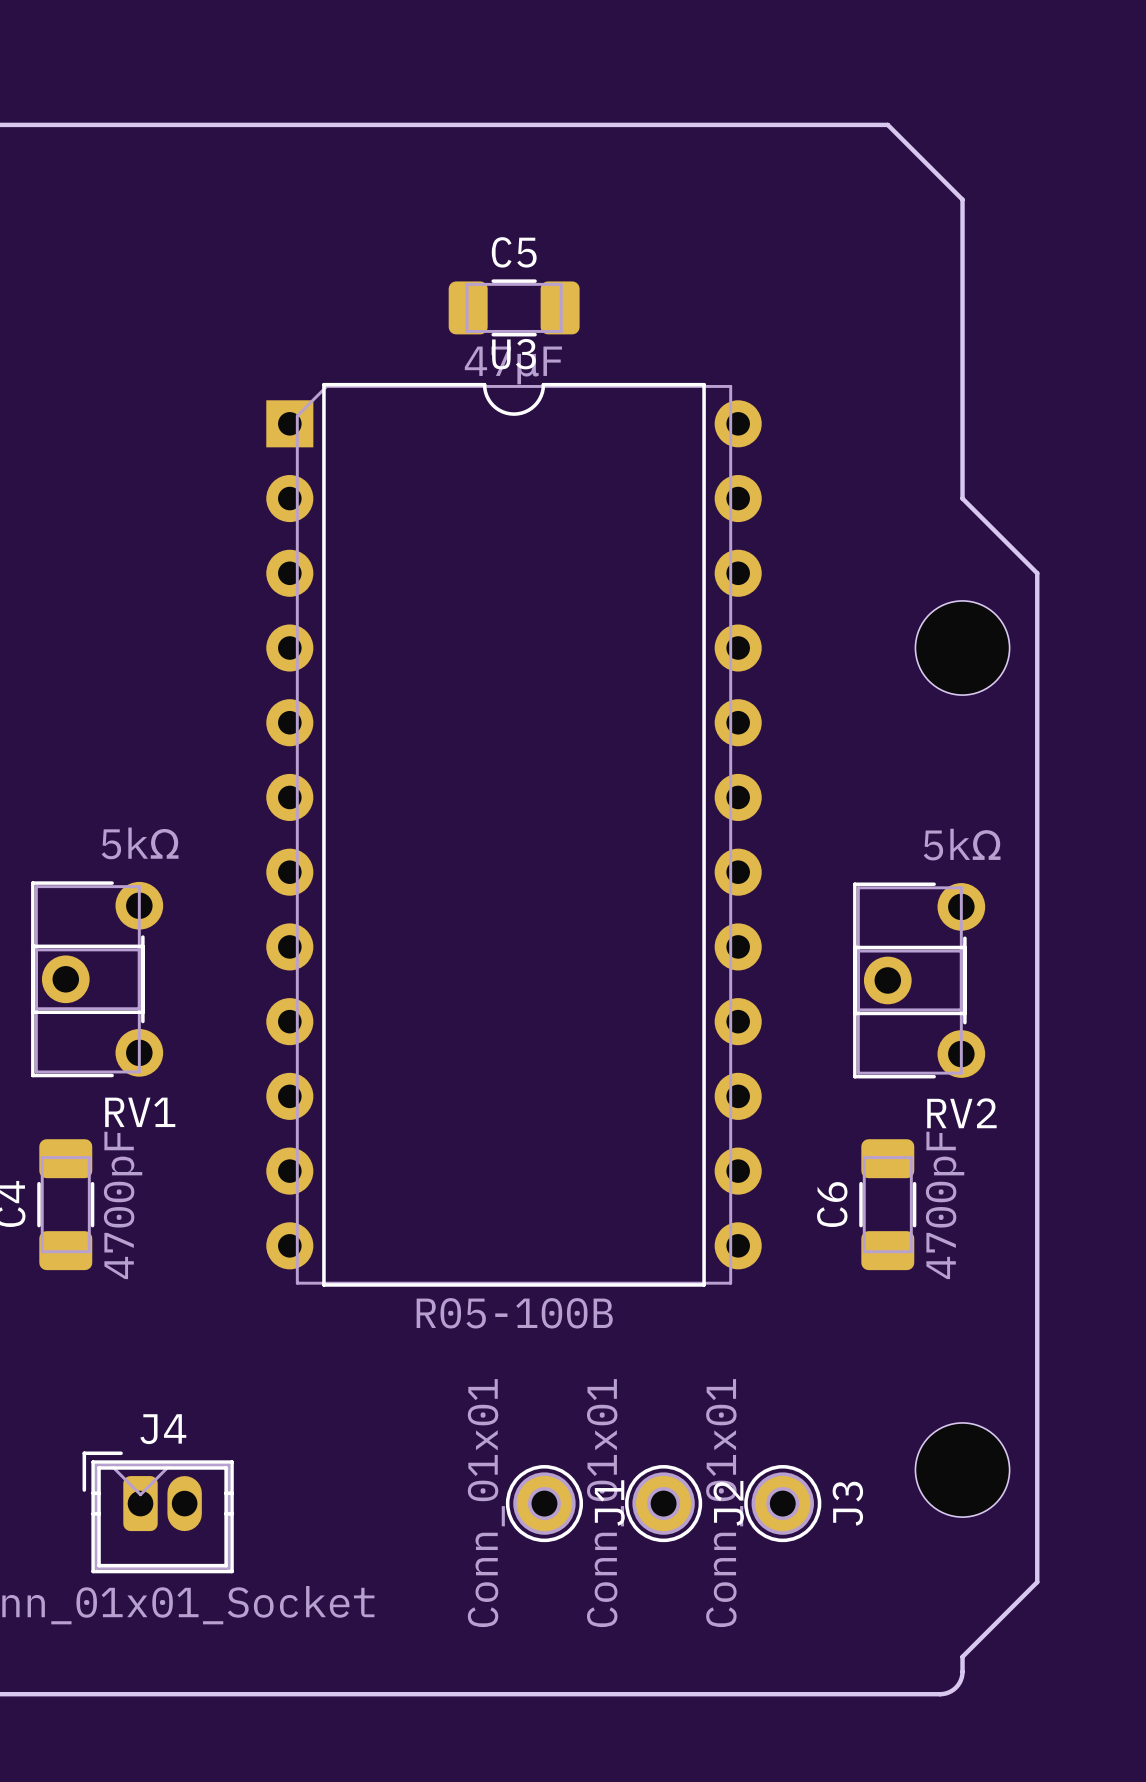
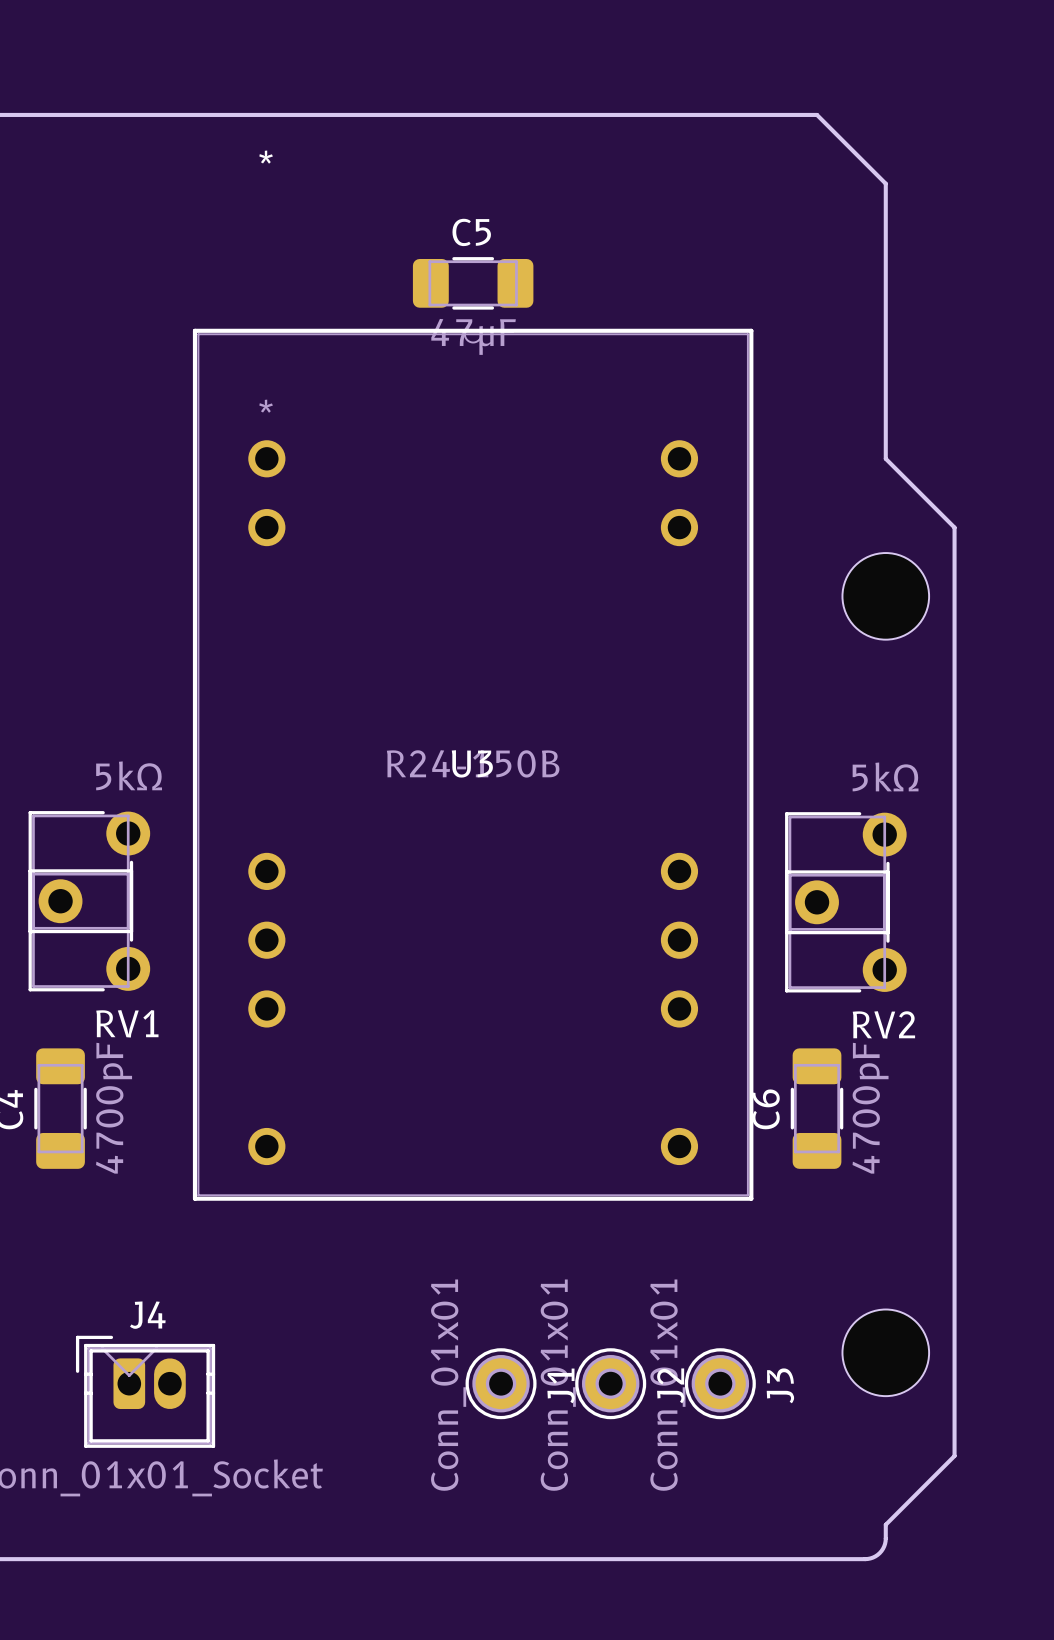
U3 name position: U3 (513, 354) -> U3 (472, 763)
U3 footprint: [266, 382, 762, 1287] -> [192, 328, 754, 1201]
U3 value: R05-100B (514, 1313) -> R24-150B (473, 763)

